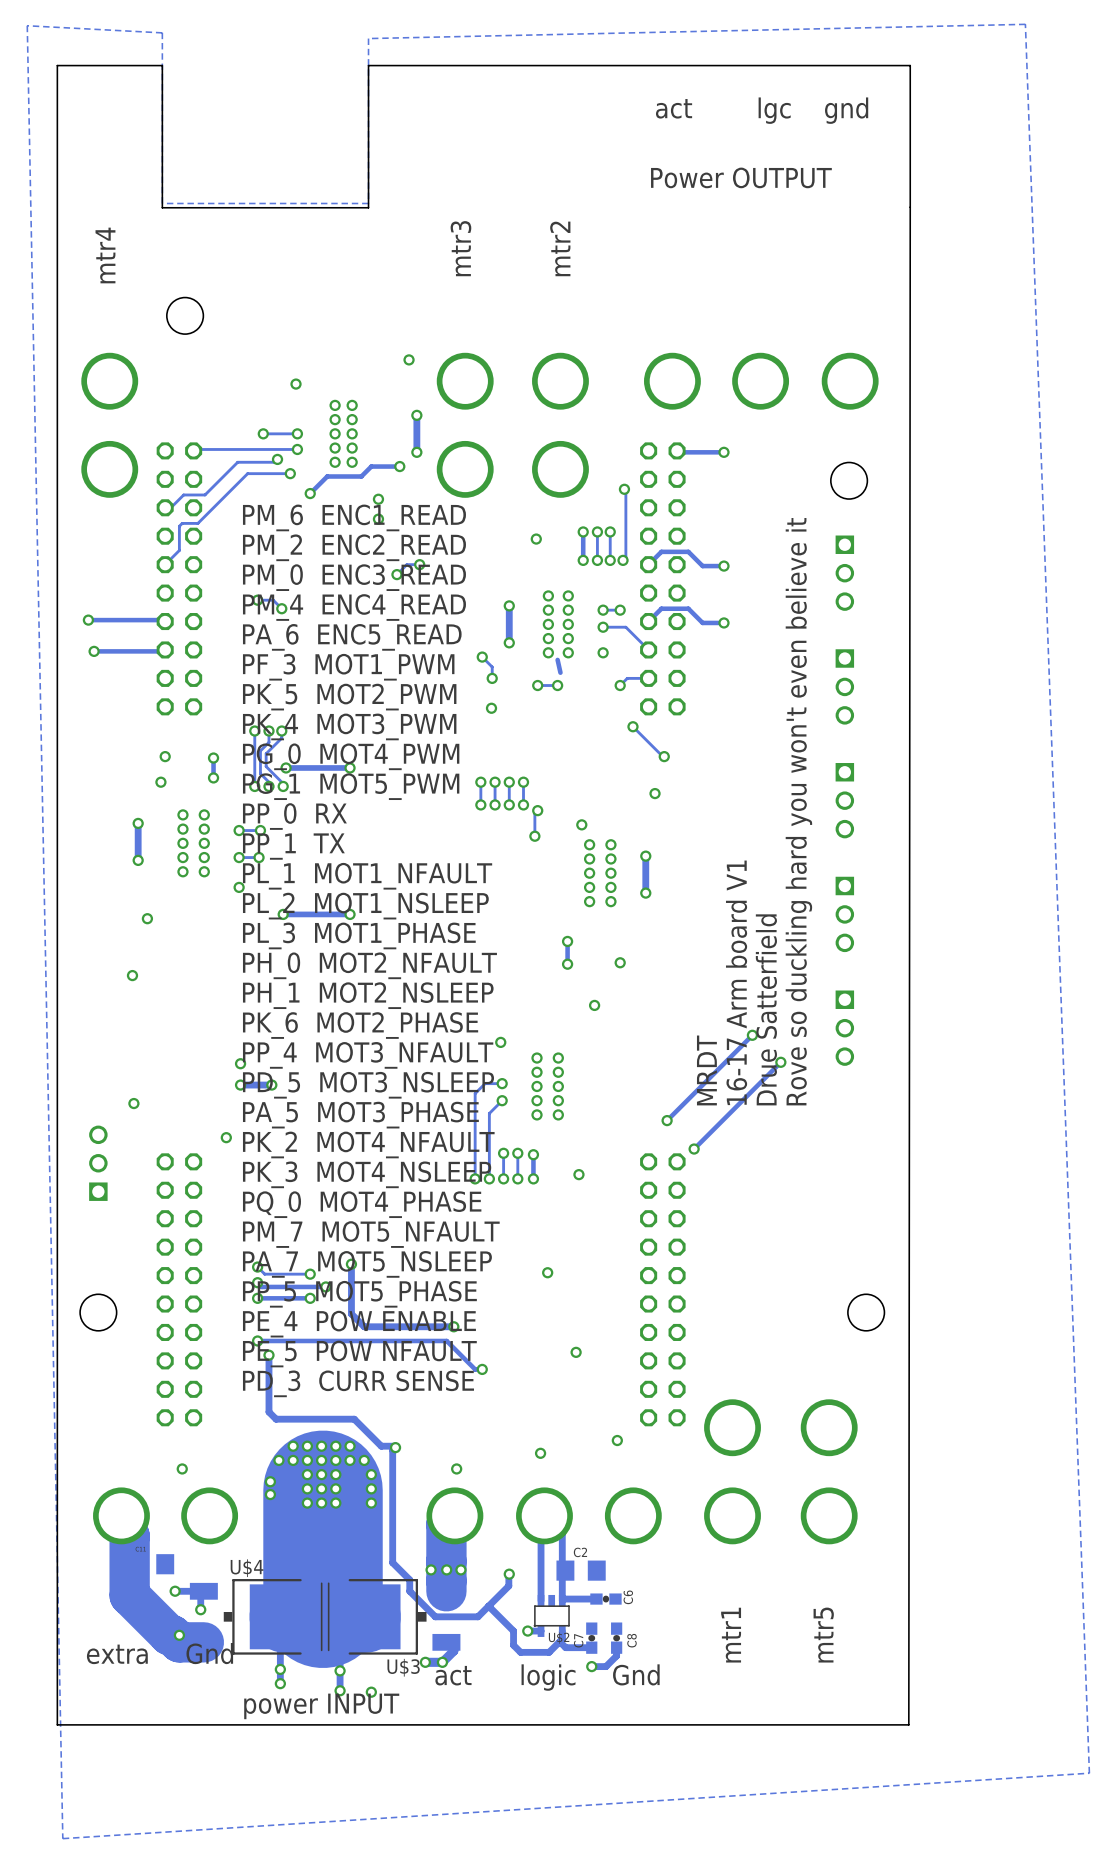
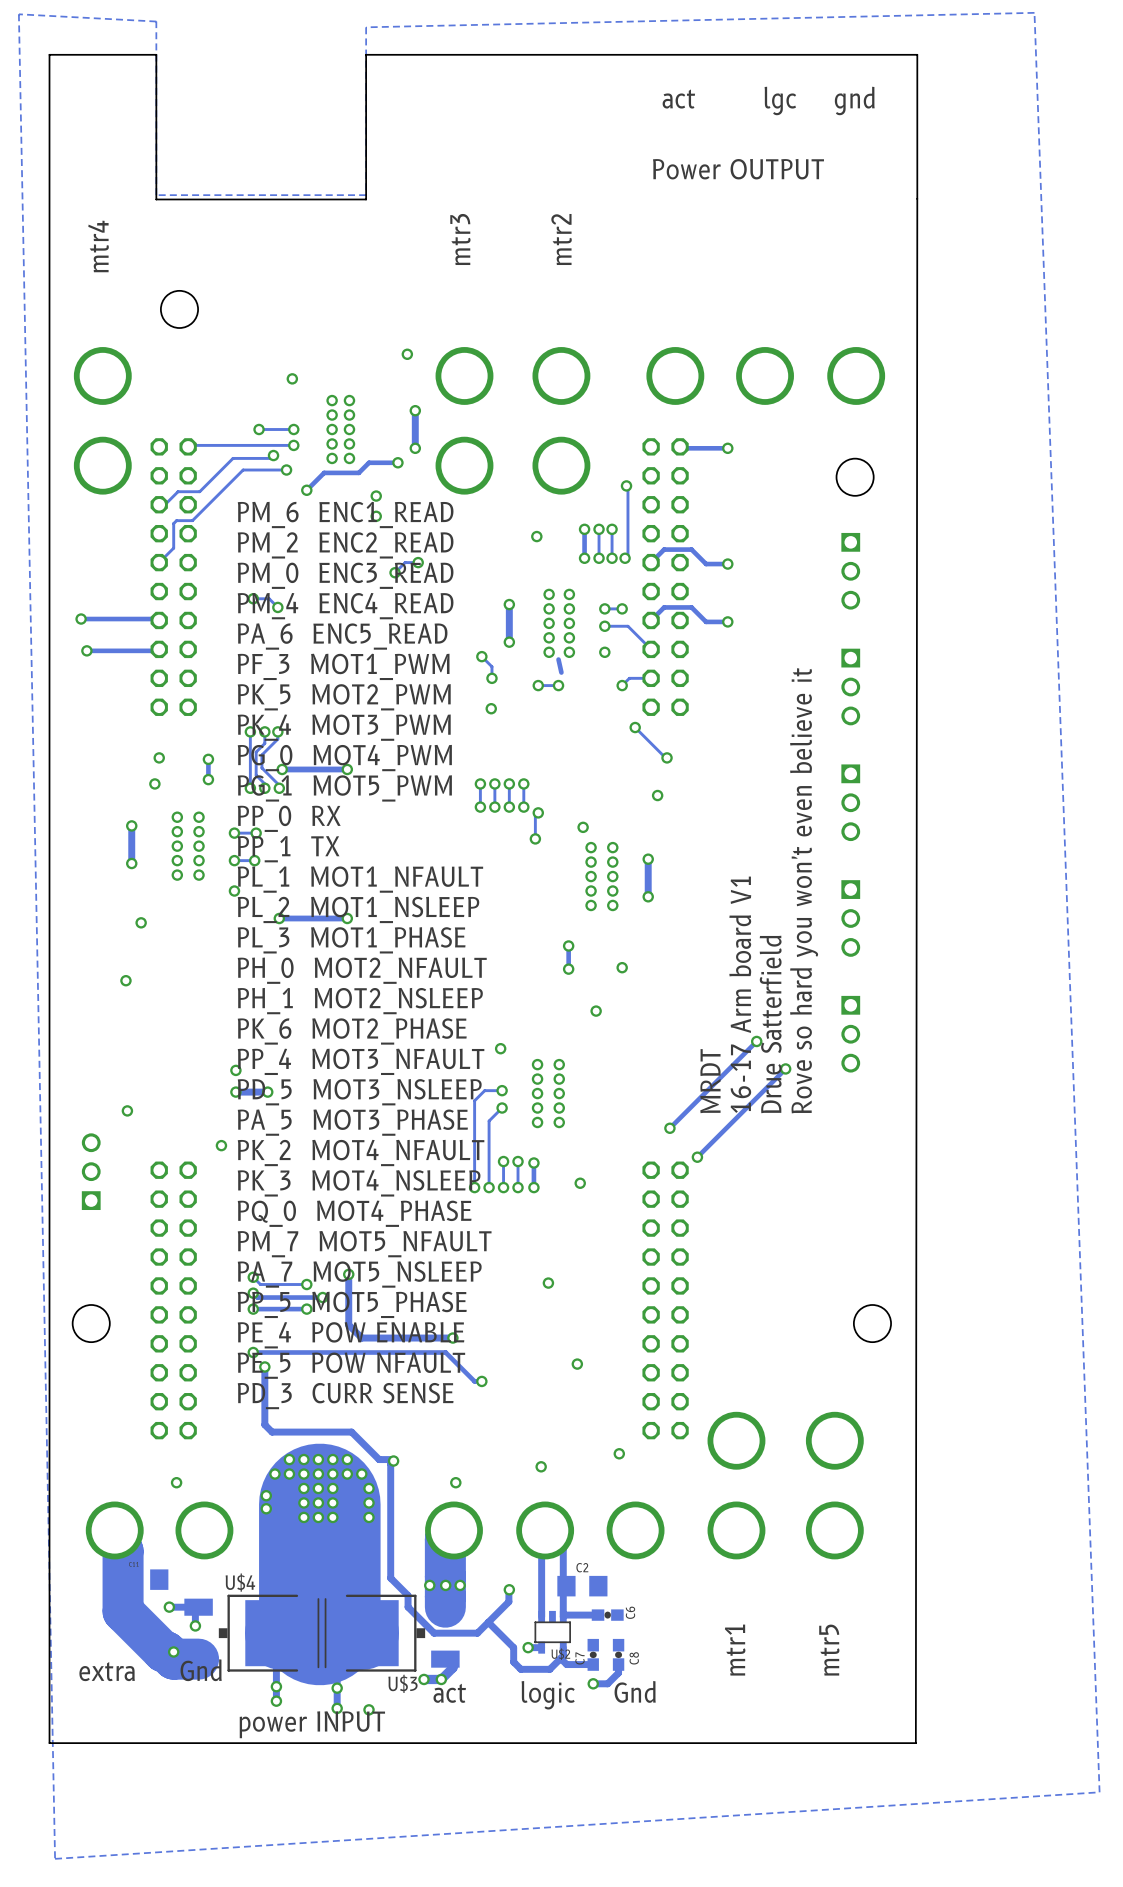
text: Rove so duckling hard you won't even believe it (798, 811) -> Rove so hard you won't even believe it (804, 890)

